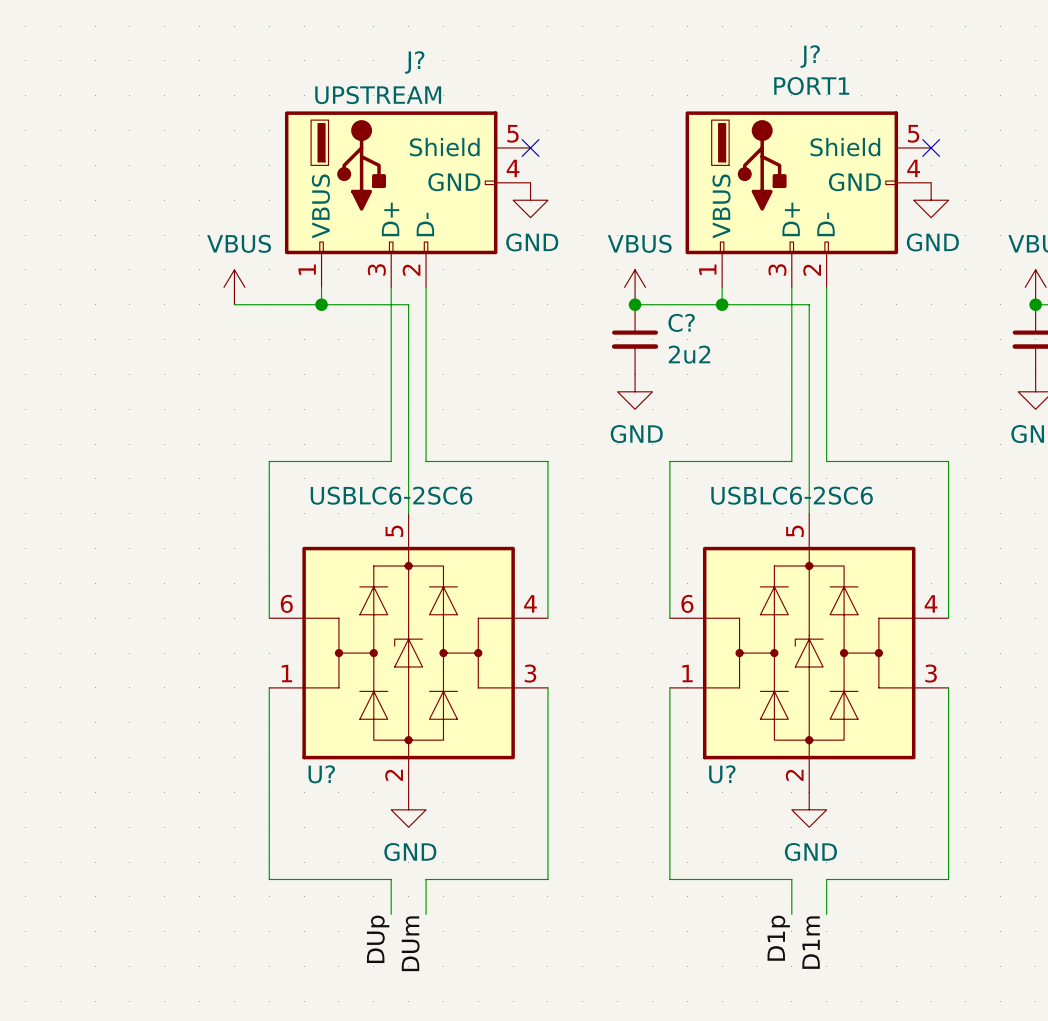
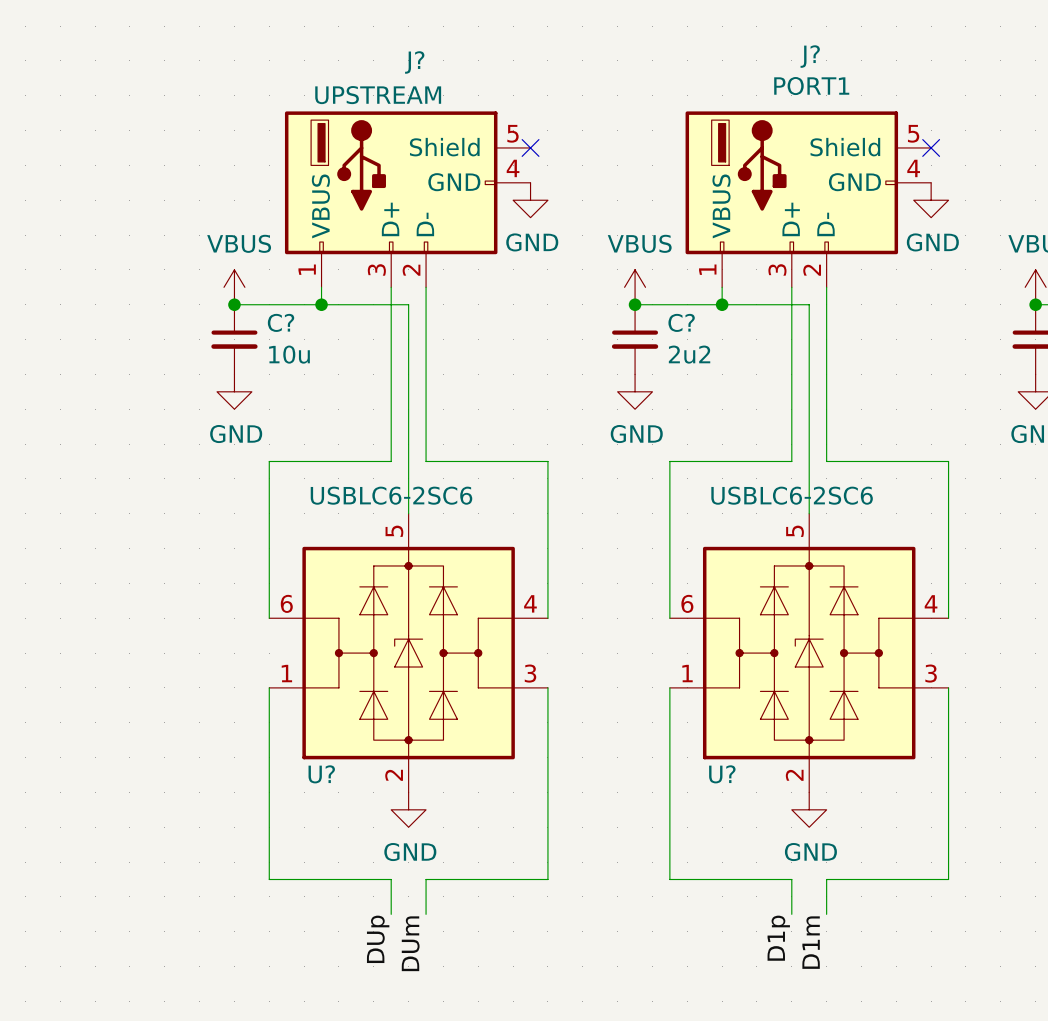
junction: none -> (234, 304)
C?: none -> 10u (234, 339)
power symbol: none -> GND (234, 391)

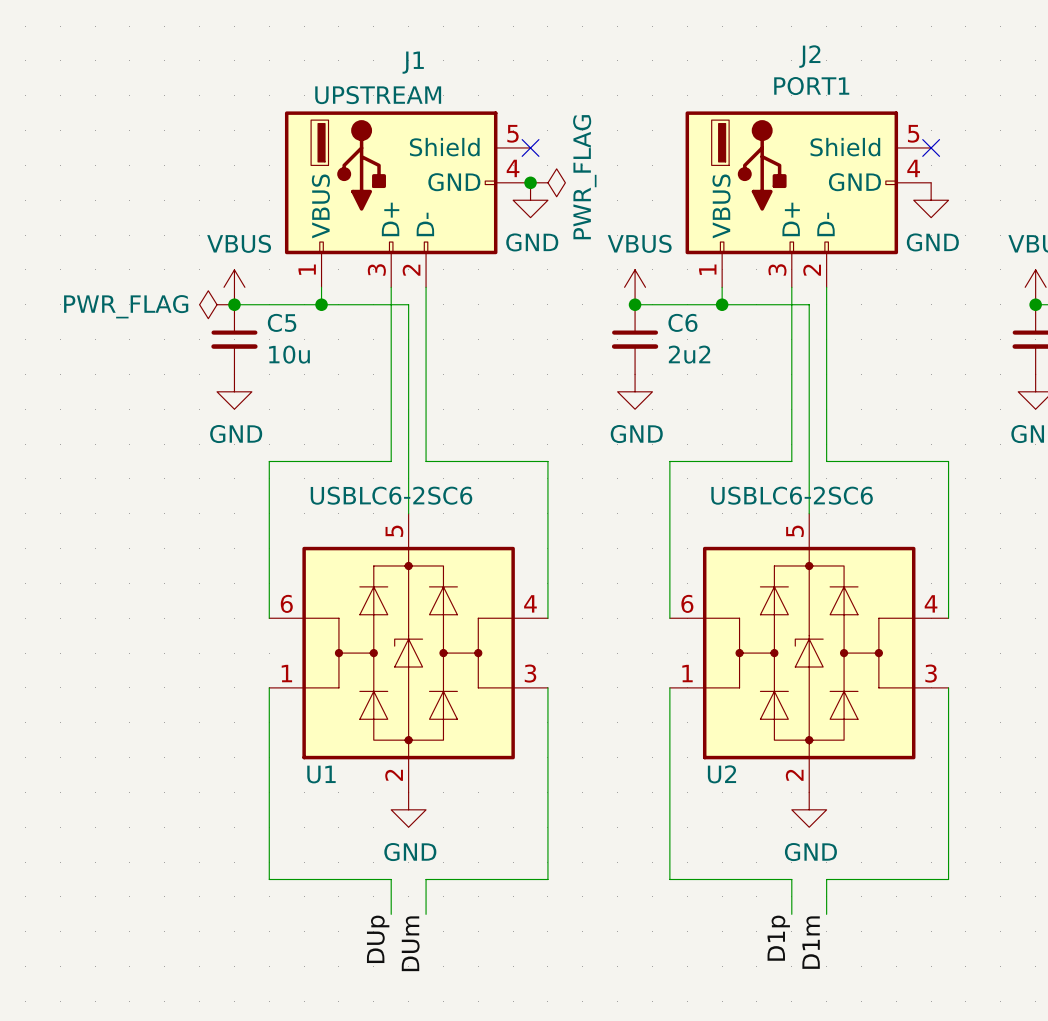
J? name: J? (810, 56) -> J2 (809, 56)
J? name: J? (414, 62) -> J1 (413, 62)
junction: none -> (530, 182)
power symbol: none -> PWR_FLAG (547, 182)
power symbol: none -> PWR_FLAG (217, 304)
C? name: C? (281, 322) -> C5 (282, 322)
C? name: C? (681, 322) -> C6 (682, 322)
U? name: U? (321, 774) -> U1 (321, 774)
U? name: U? (722, 774) -> U2 (721, 774)

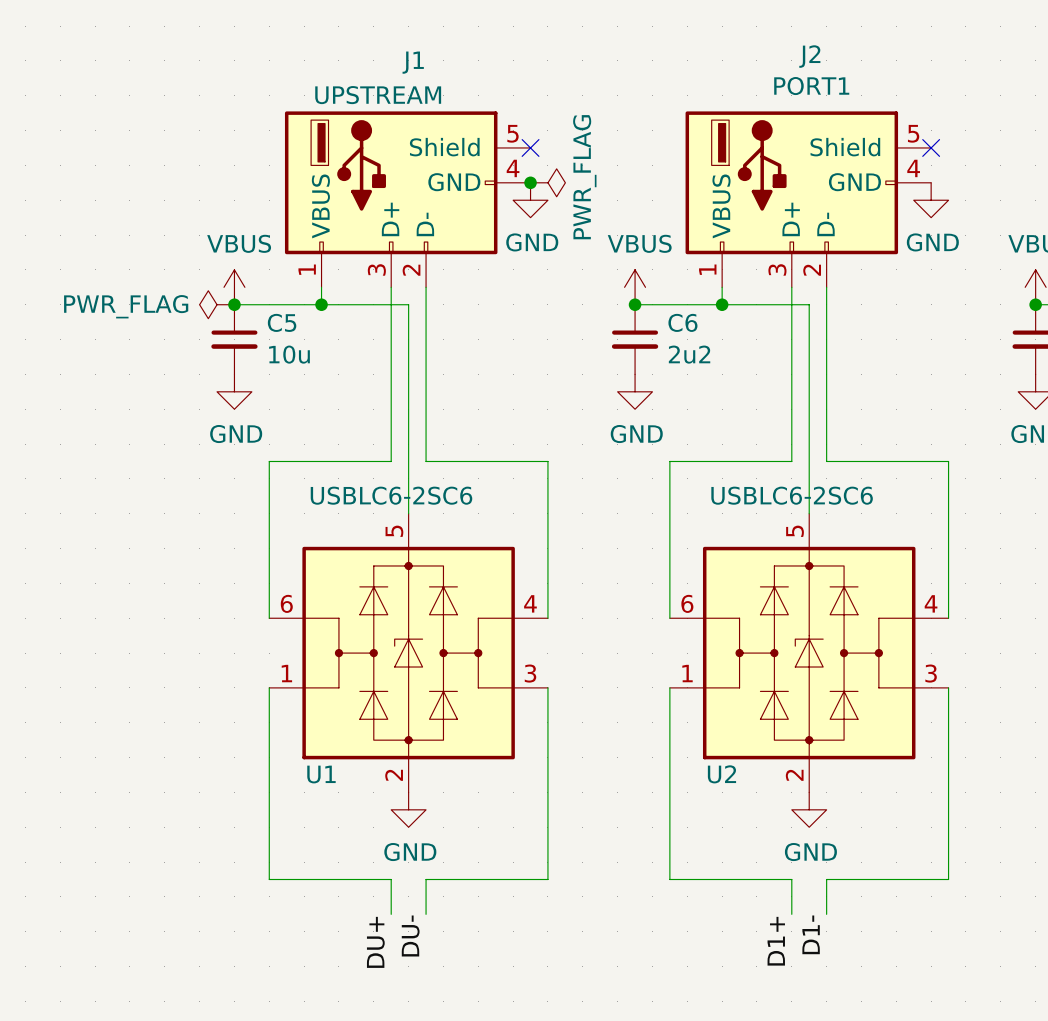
label: D1p (778, 938) -> D1+ (776, 941)
label: DUp (378, 939) -> DU+ (375, 942)
label: D1m (811, 942) -> D1- (811, 934)
label: DUm (410, 943) -> DU- (410, 935)

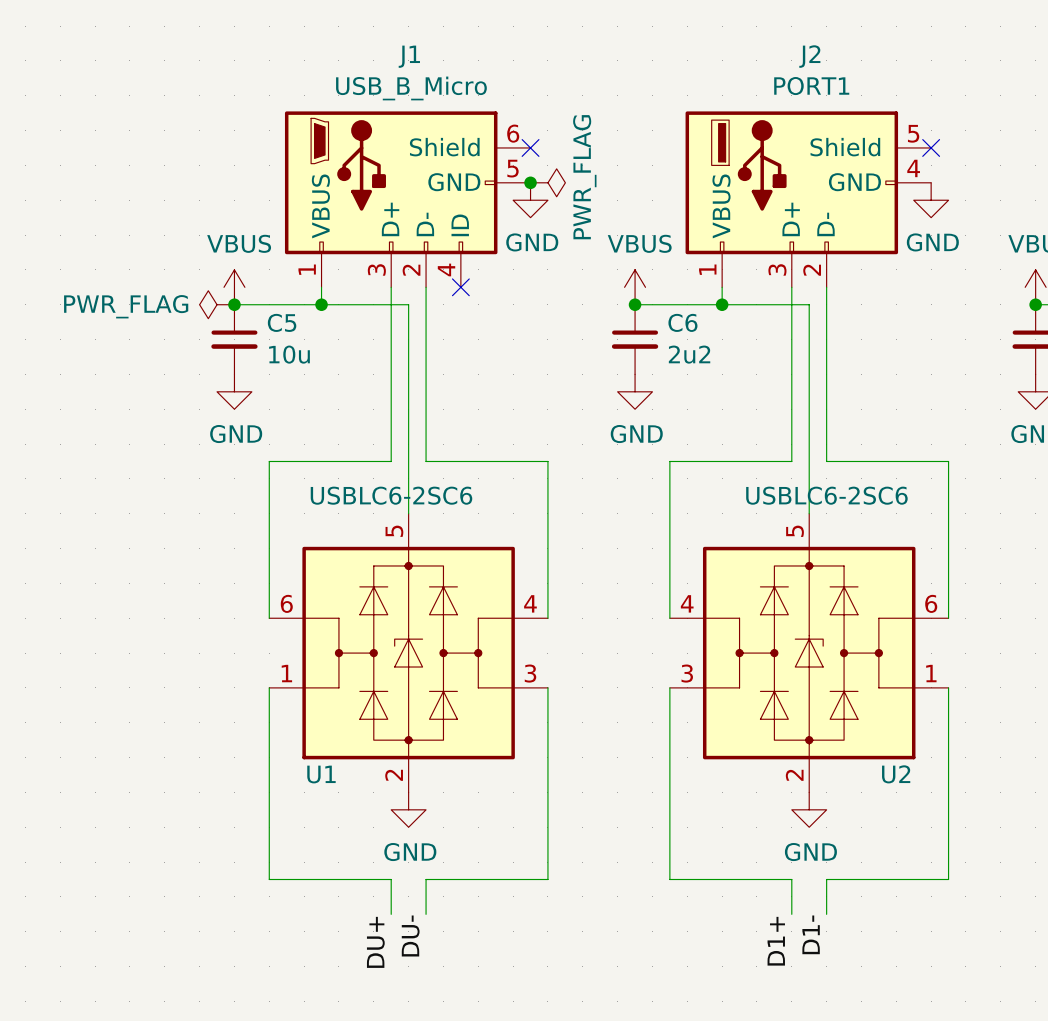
J1 value: UPSTREAM (378, 95) -> USB_B_Micro (411, 88)
J1 symbol: [284, 111, 531, 288] -> [284, 111, 531, 288]
no-connect mark: none -> (460, 287)
U2 flip: as is (809, 653) -> left-right (809, 653)

